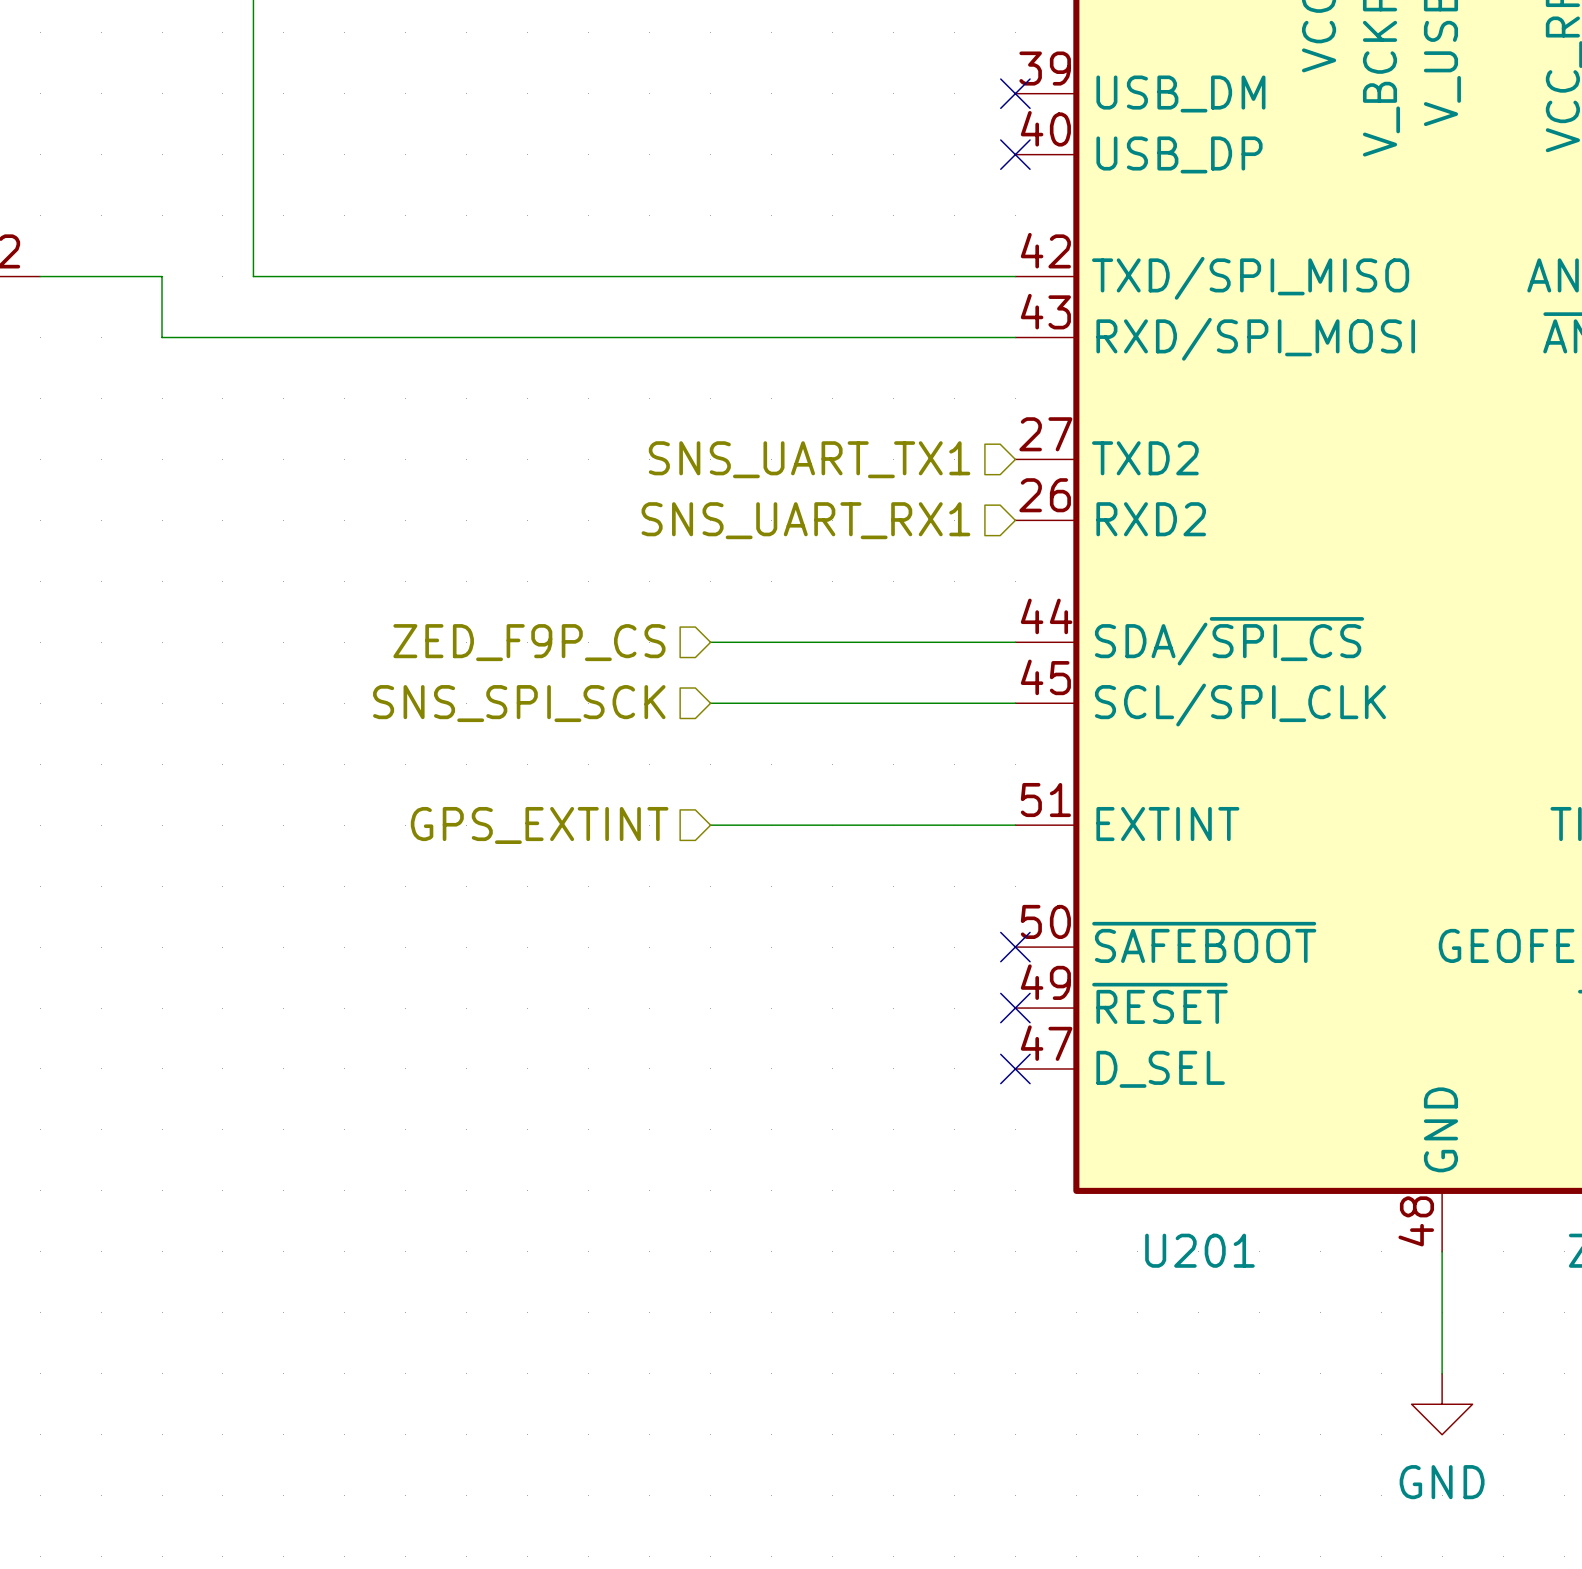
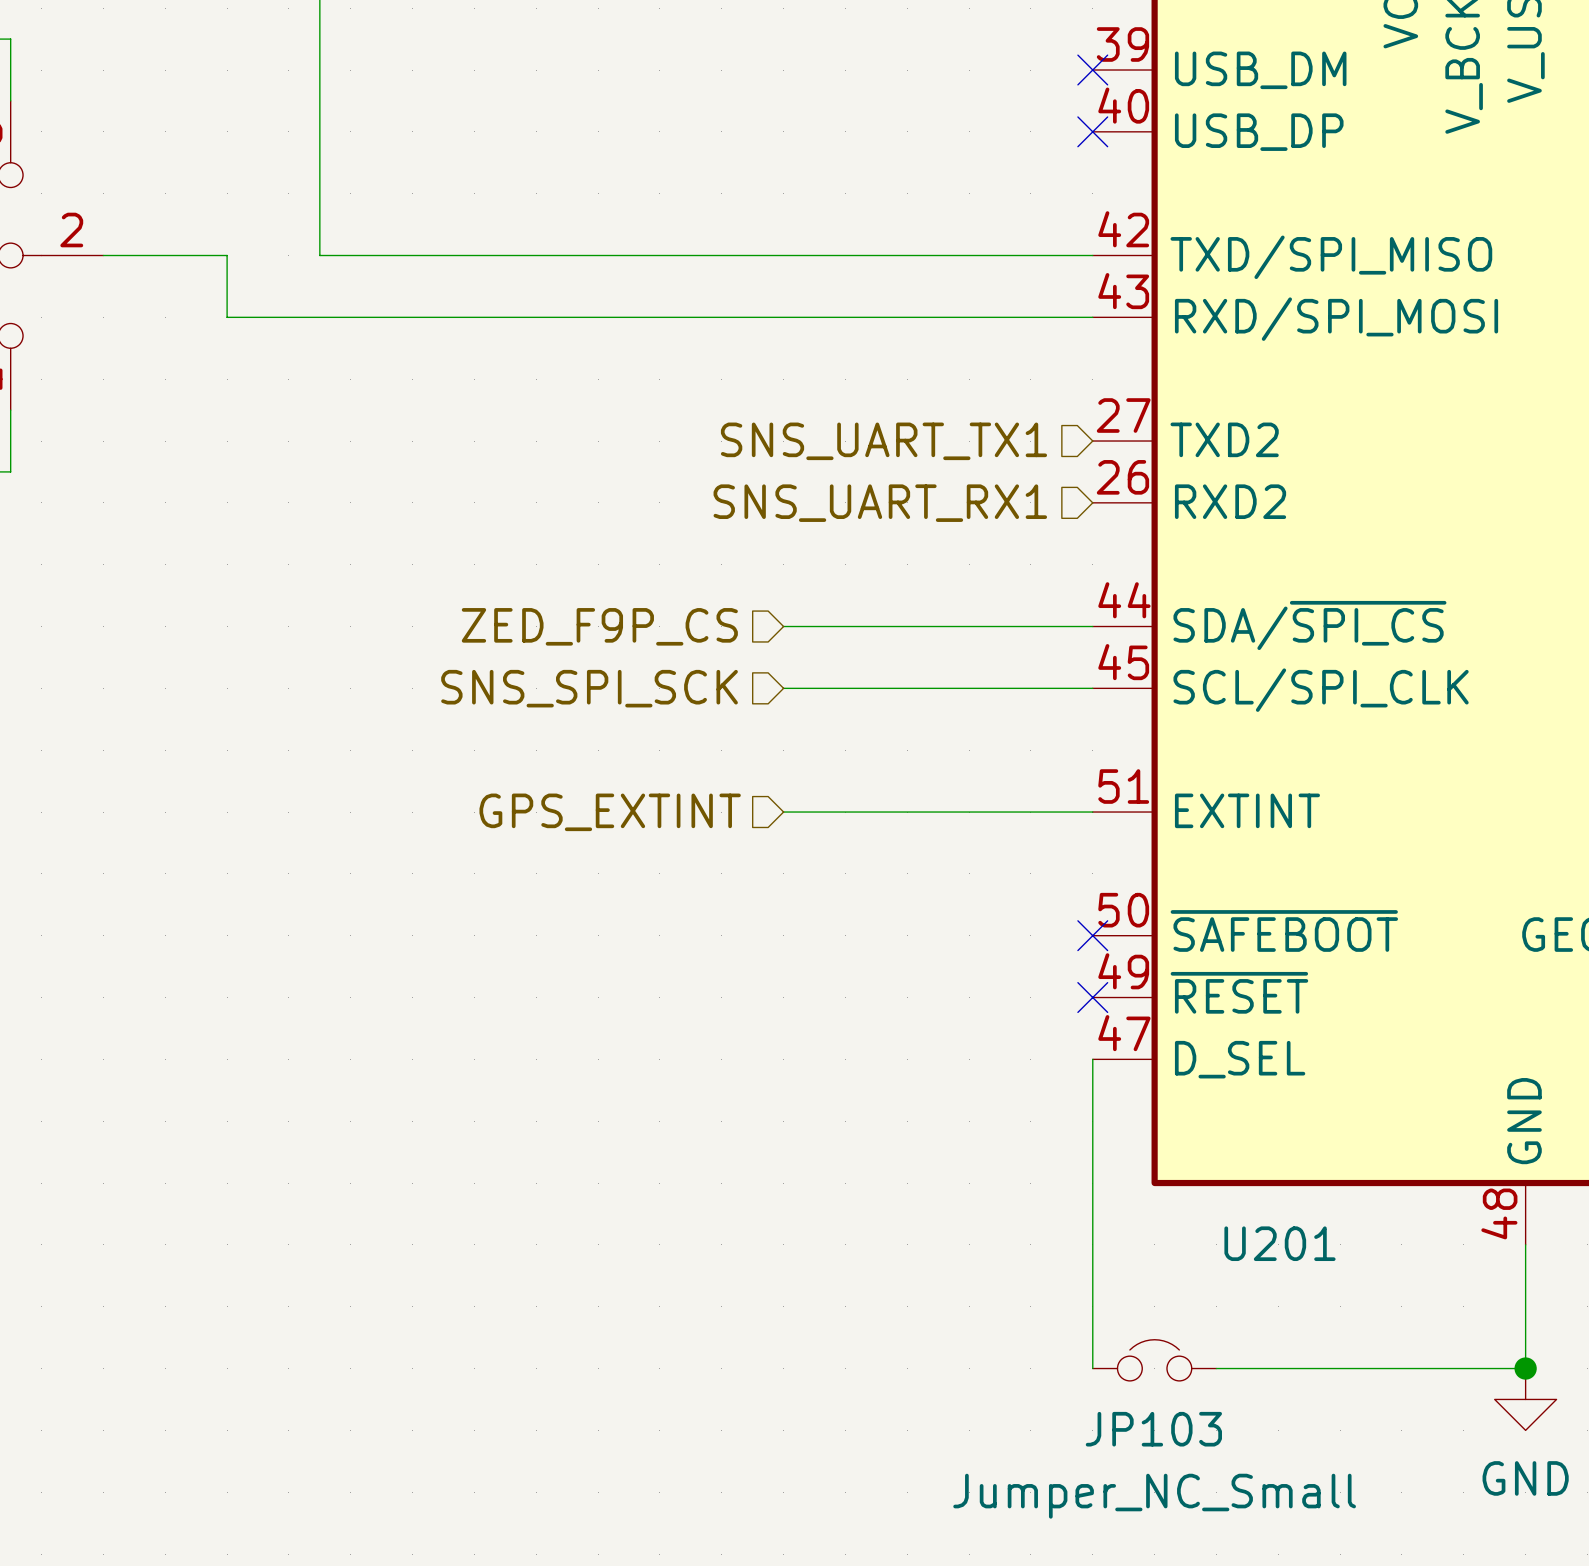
wire: none -> (1092, 1059) (1092, 1368)
no-connect mark: (1015, 1068) -> none
JP103: none -> Jumper_NC_Small (1154, 1360)
wire: none -> (1216, 1368) (1525, 1368)
junction: none -> (1525, 1368)

